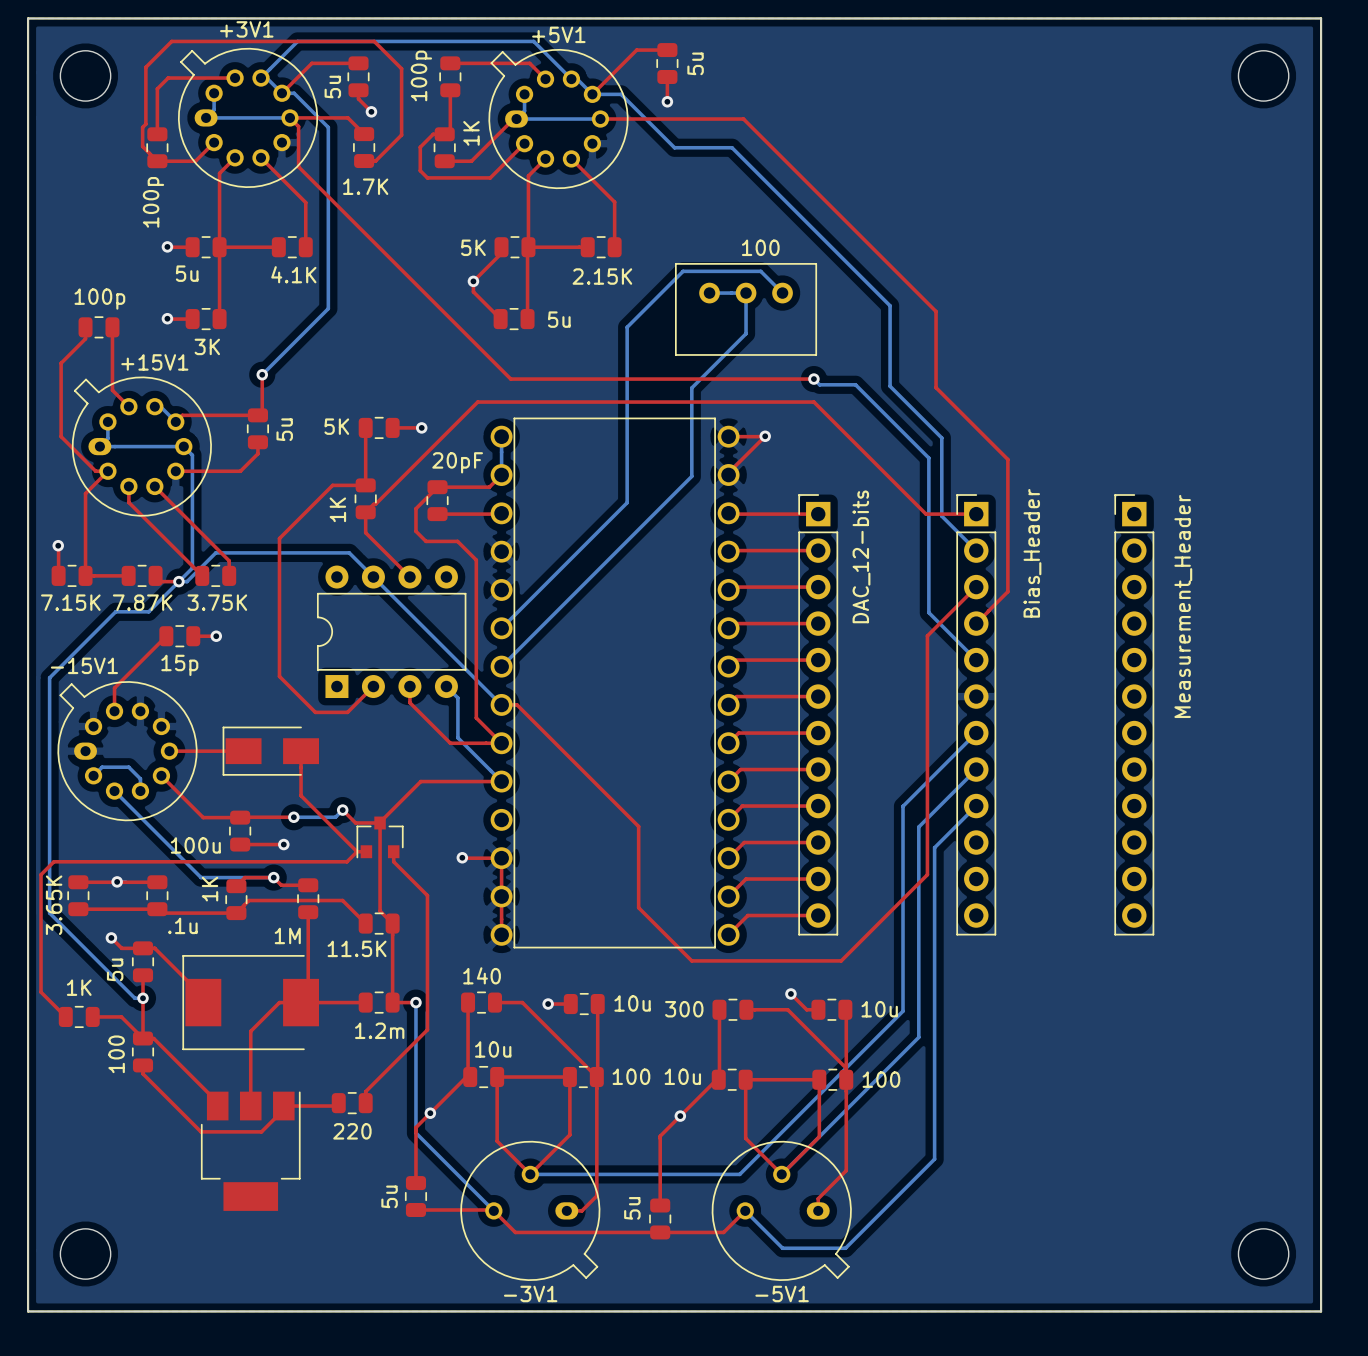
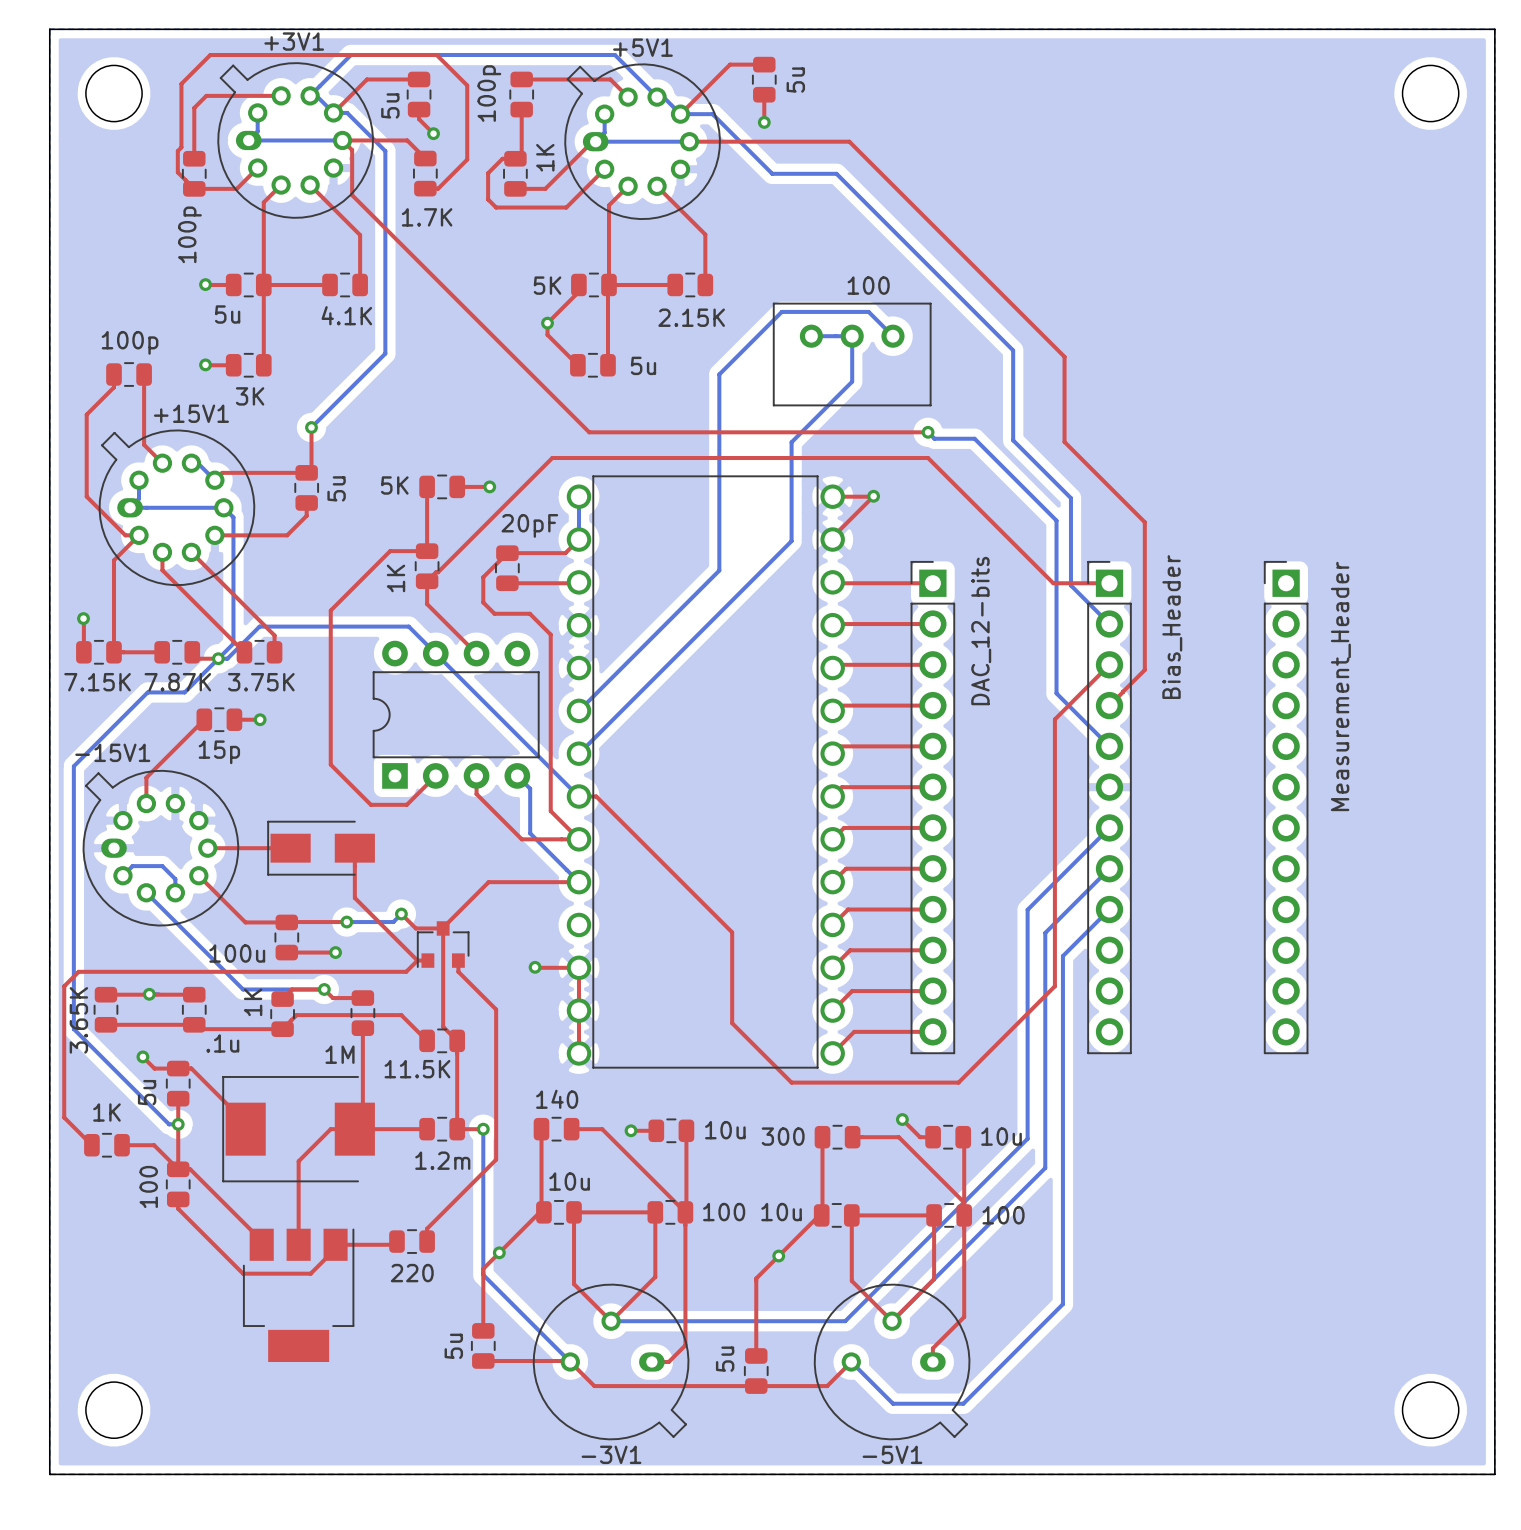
line: (28, 18) (1321, 18) (1321, 1311) (28, 1311) (28, 18) -> none

